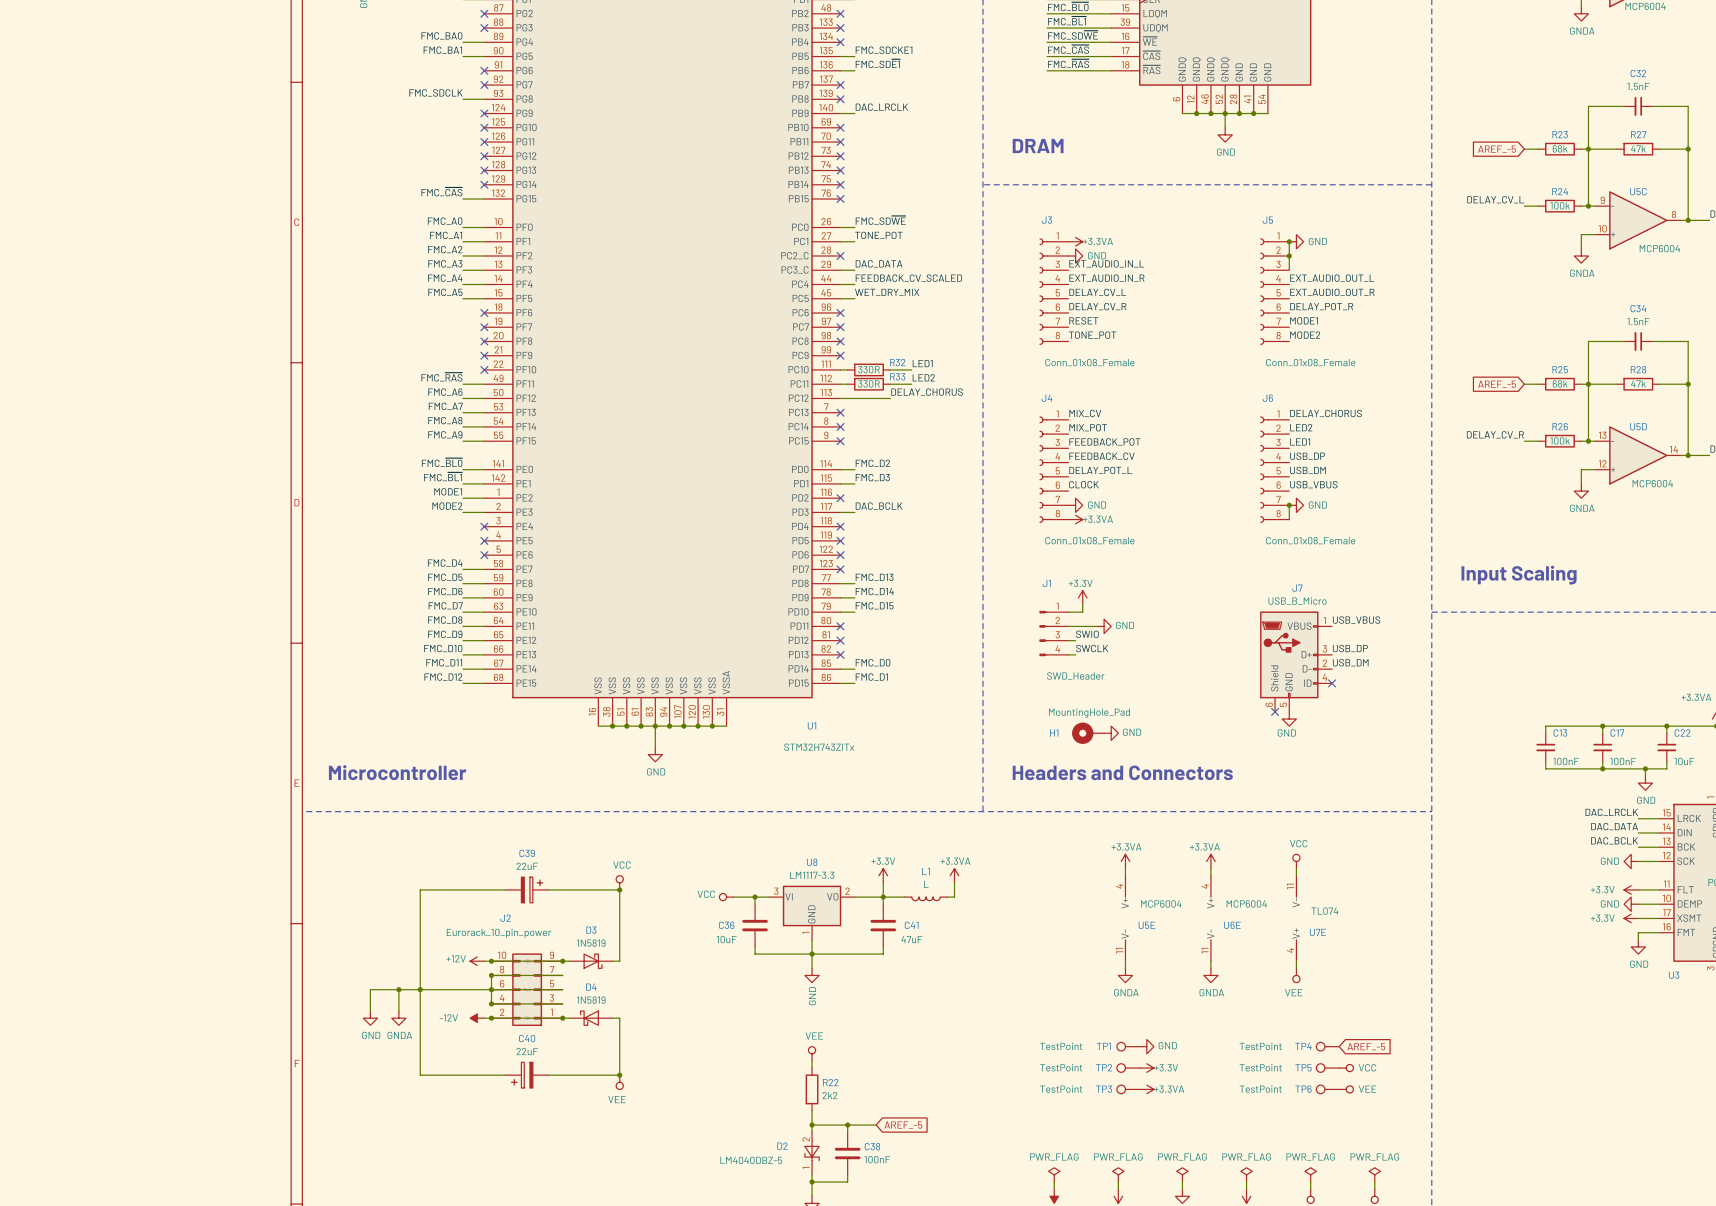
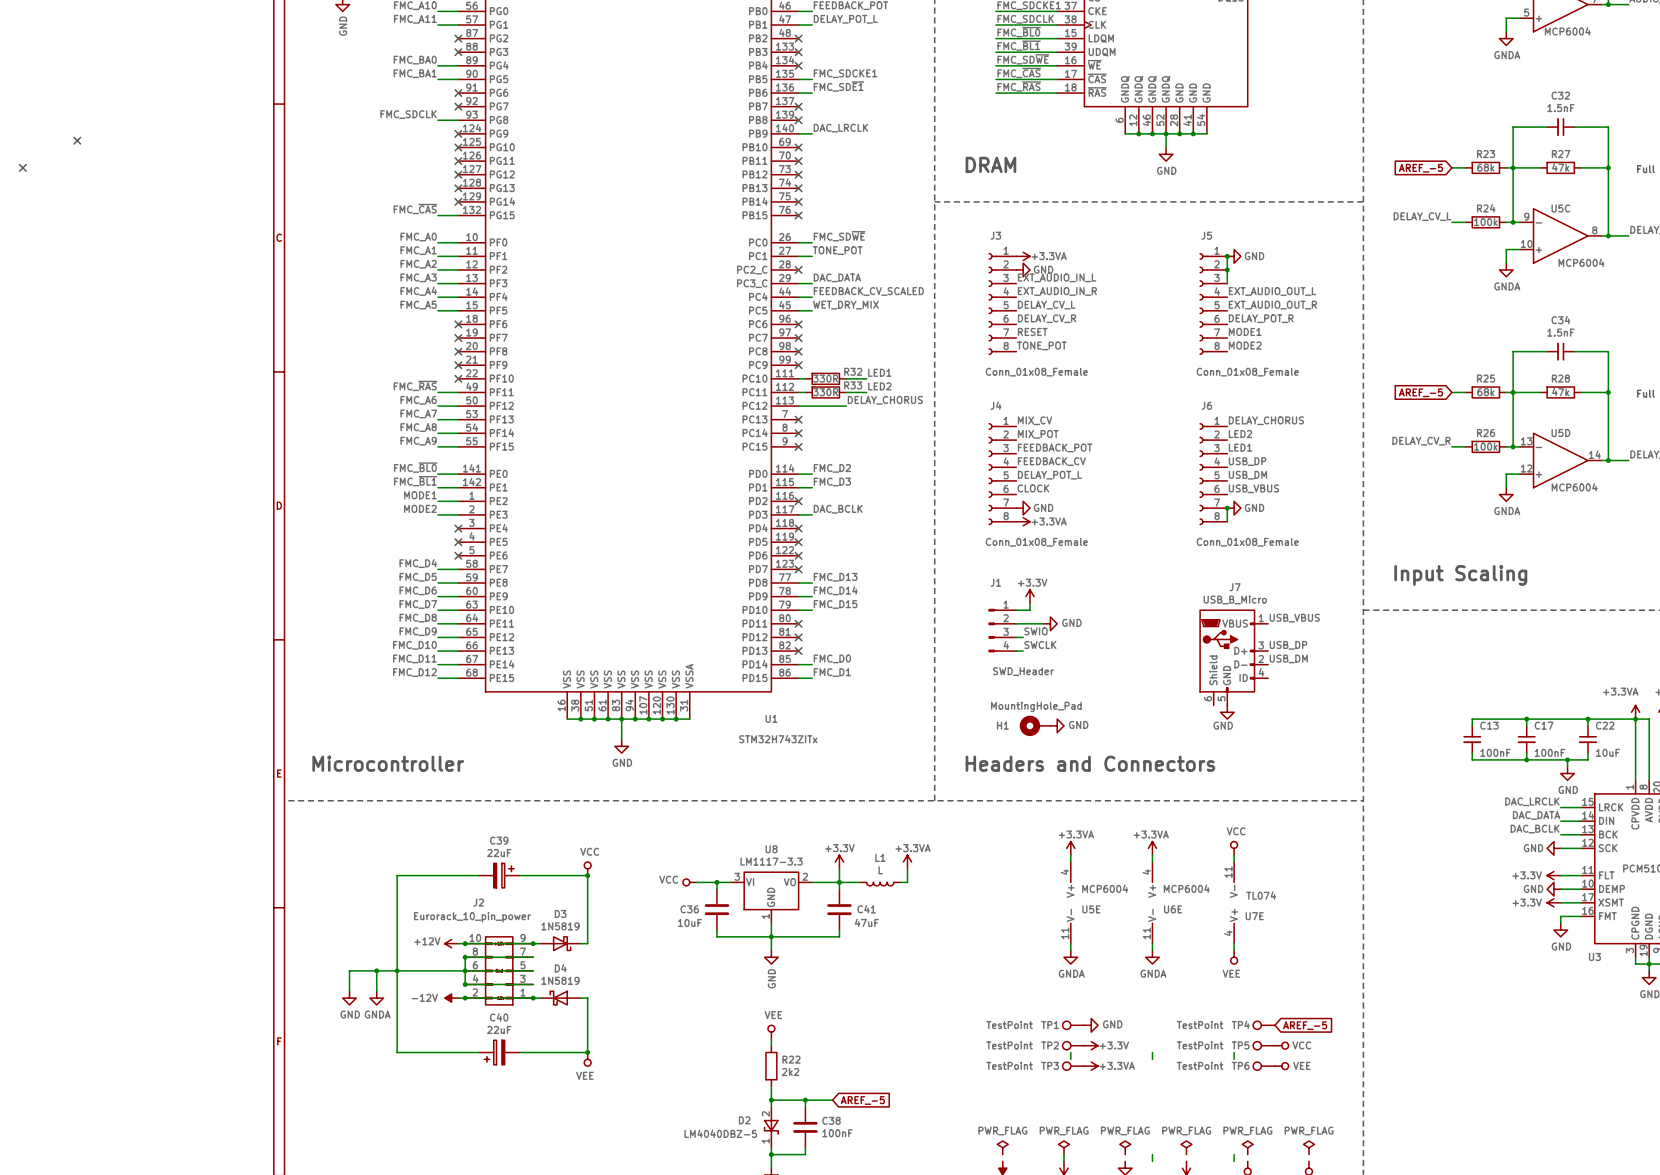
no-connect mark: none -> (77, 140)
no-connect mark: none -> (22, 167)
no-connect mark: (1332, 683) -> none
no-connect mark: (1275, 711) -> none
wire: (1054, 1182) (1054, 1189) -> (1070, 1052) (1070, 1059)
wire: (1182, 1182) (1182, 1189) -> (1152, 1154) (1152, 1161)
wire: (1246, 1182) (1246, 1189) -> (1152, 1052) (1152, 1059)
wire: (1310, 1182) (1310, 1189) -> (1234, 1154) (1234, 1161)
wire: (1374, 1182) (1374, 1189) -> (1234, 1052) (1234, 1059)

